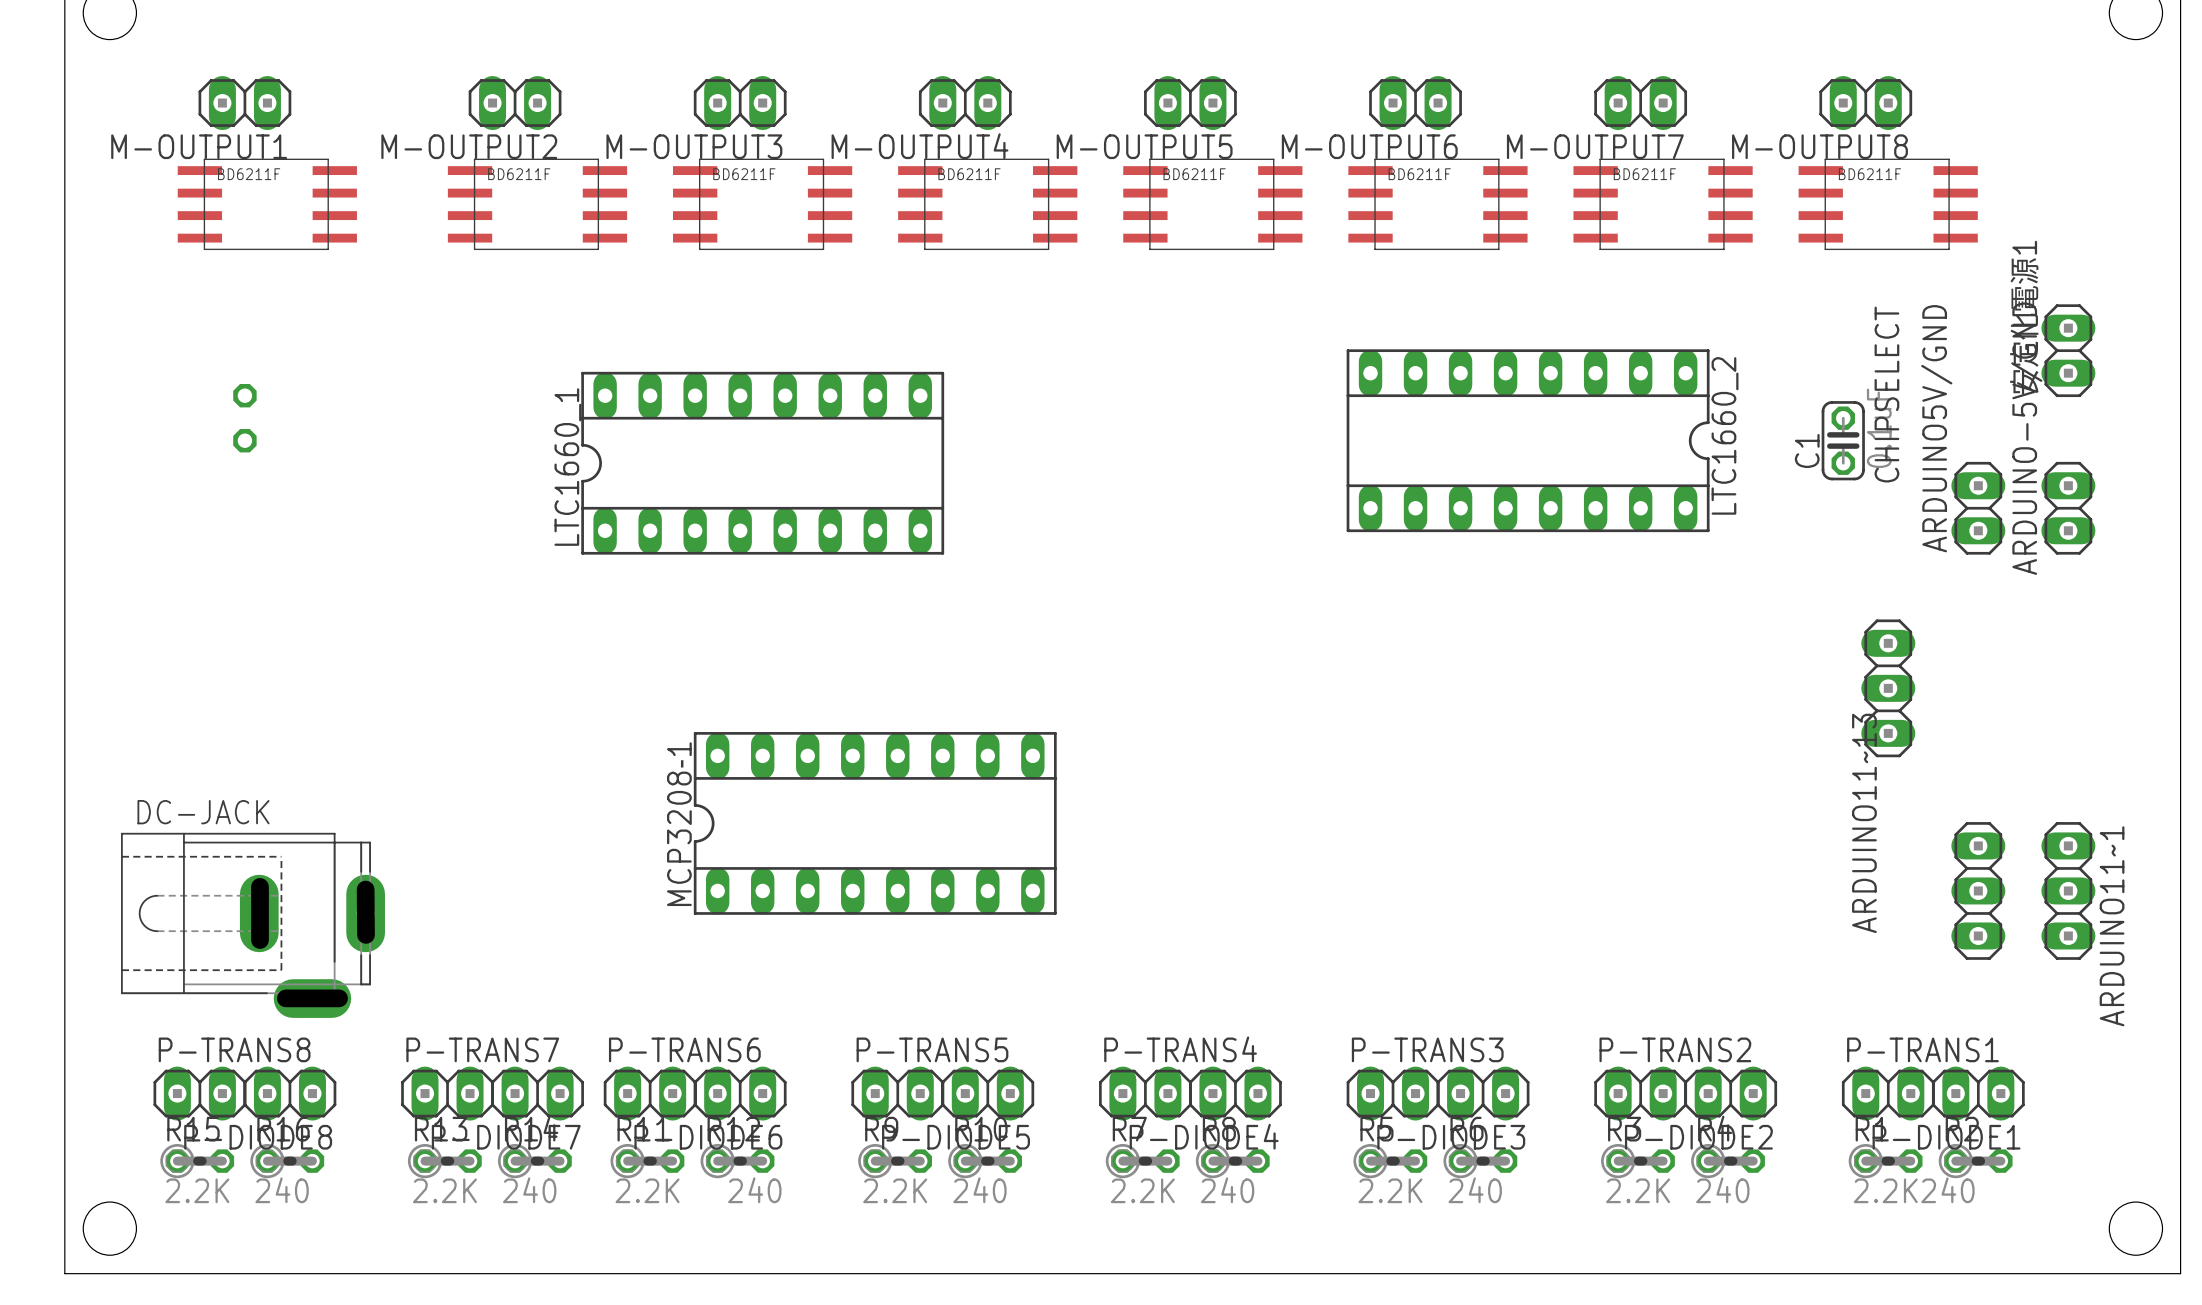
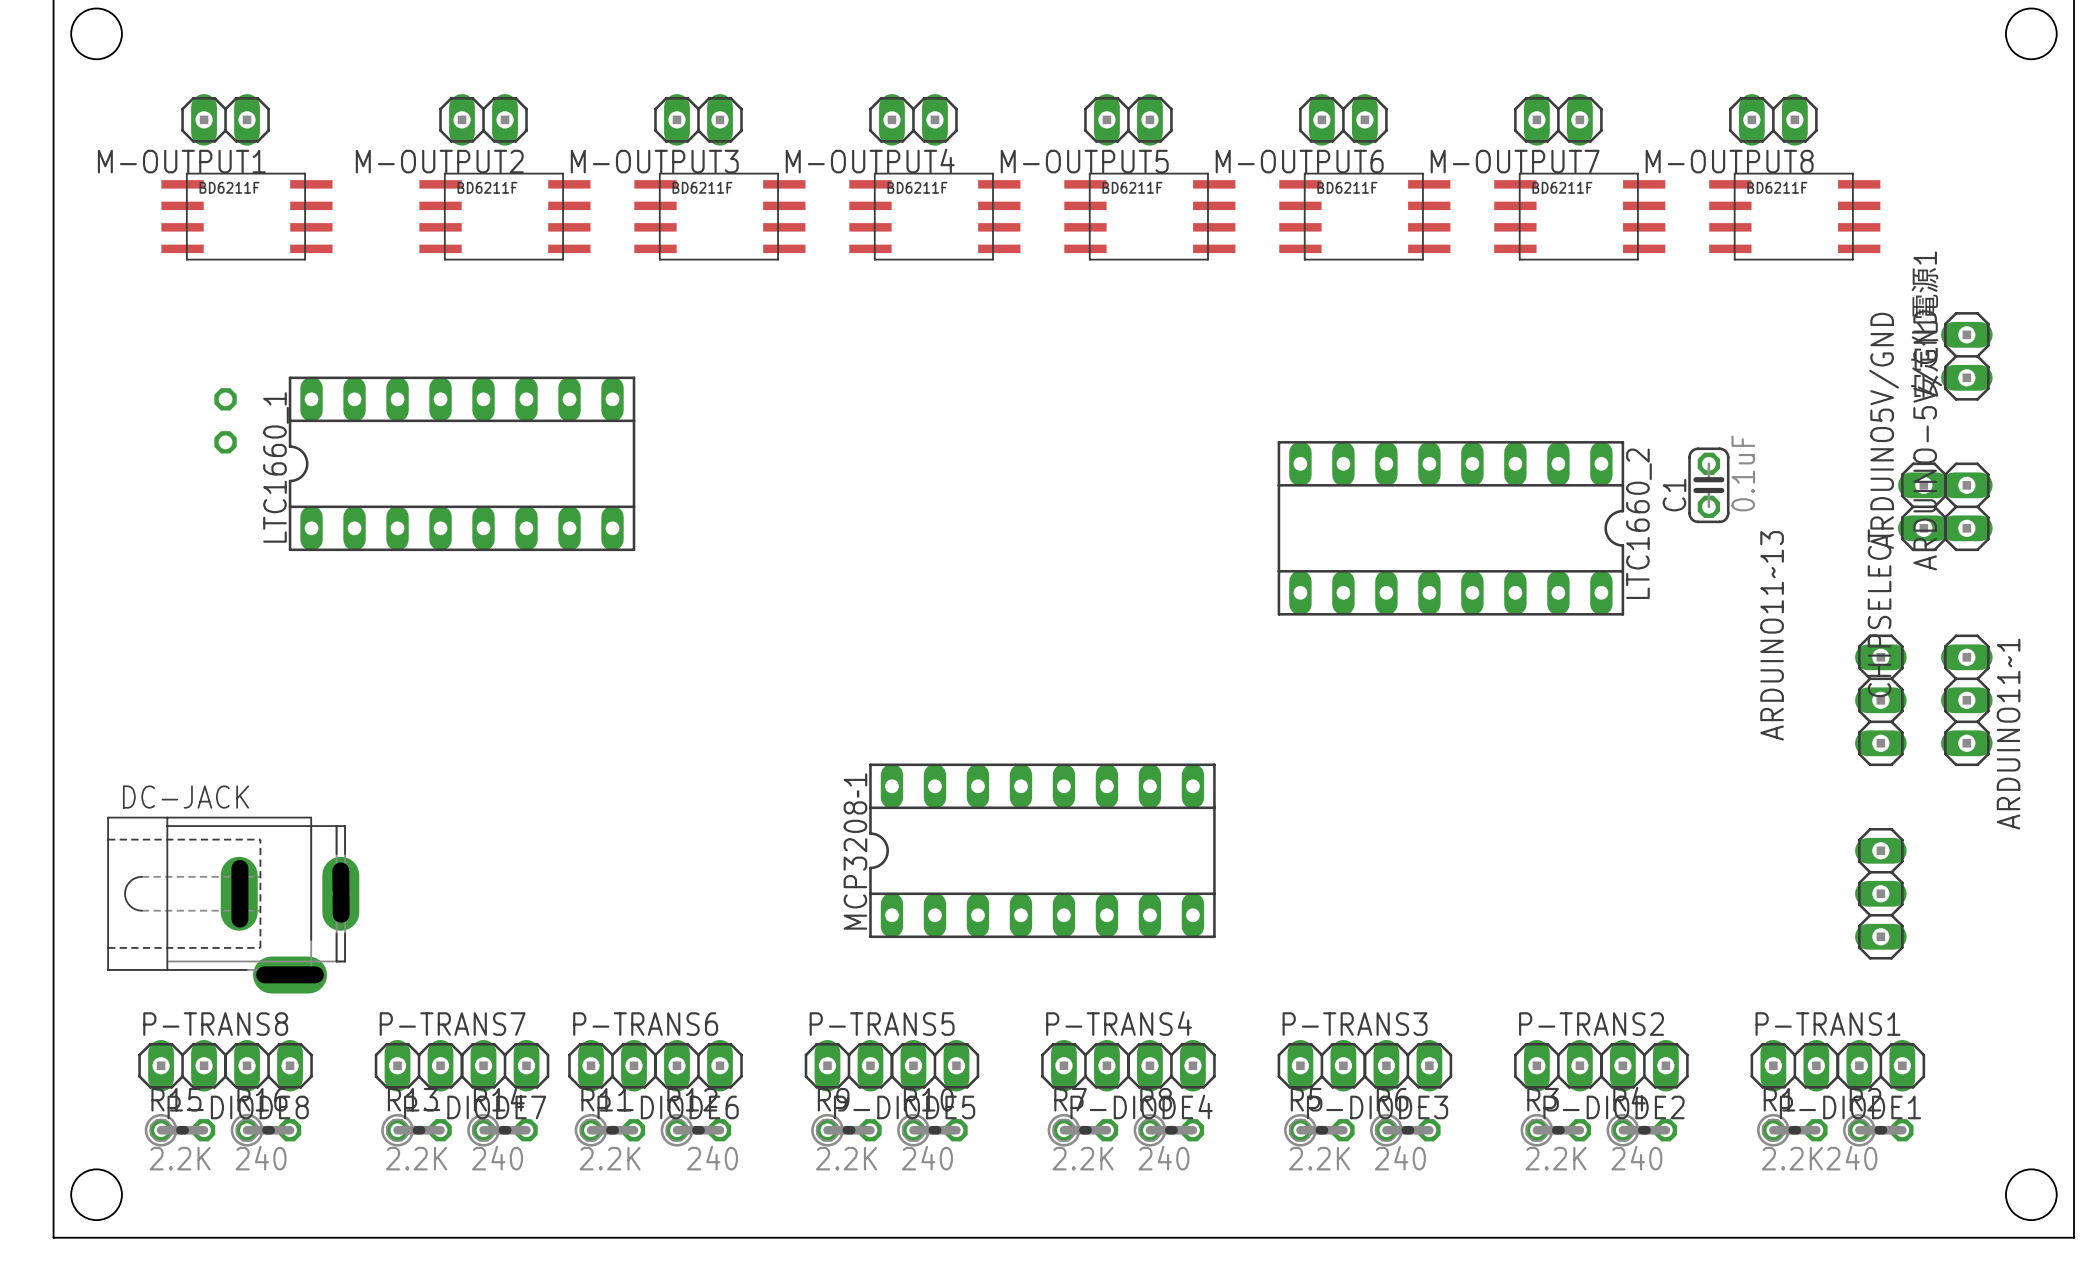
LTC1660_2 position: (1528, 440) -> (1450, 528)
C1 position: (1843, 440) -> (1708, 485)
LTC1660_1 position: (762, 463) -> (462, 463)
ARDUINO5V/GND position: (1978, 508) -> (1923, 506)
CHIPSELECT position: (1888, 688) -> (1880, 893)
MCP3208‐1 position: (875, 823) -> (1042, 850)
ARDUINO11~13 position: (1978, 890) -> (1880, 700)
ARDUINO11~1 position: (2068, 890) -> (1966, 700)

